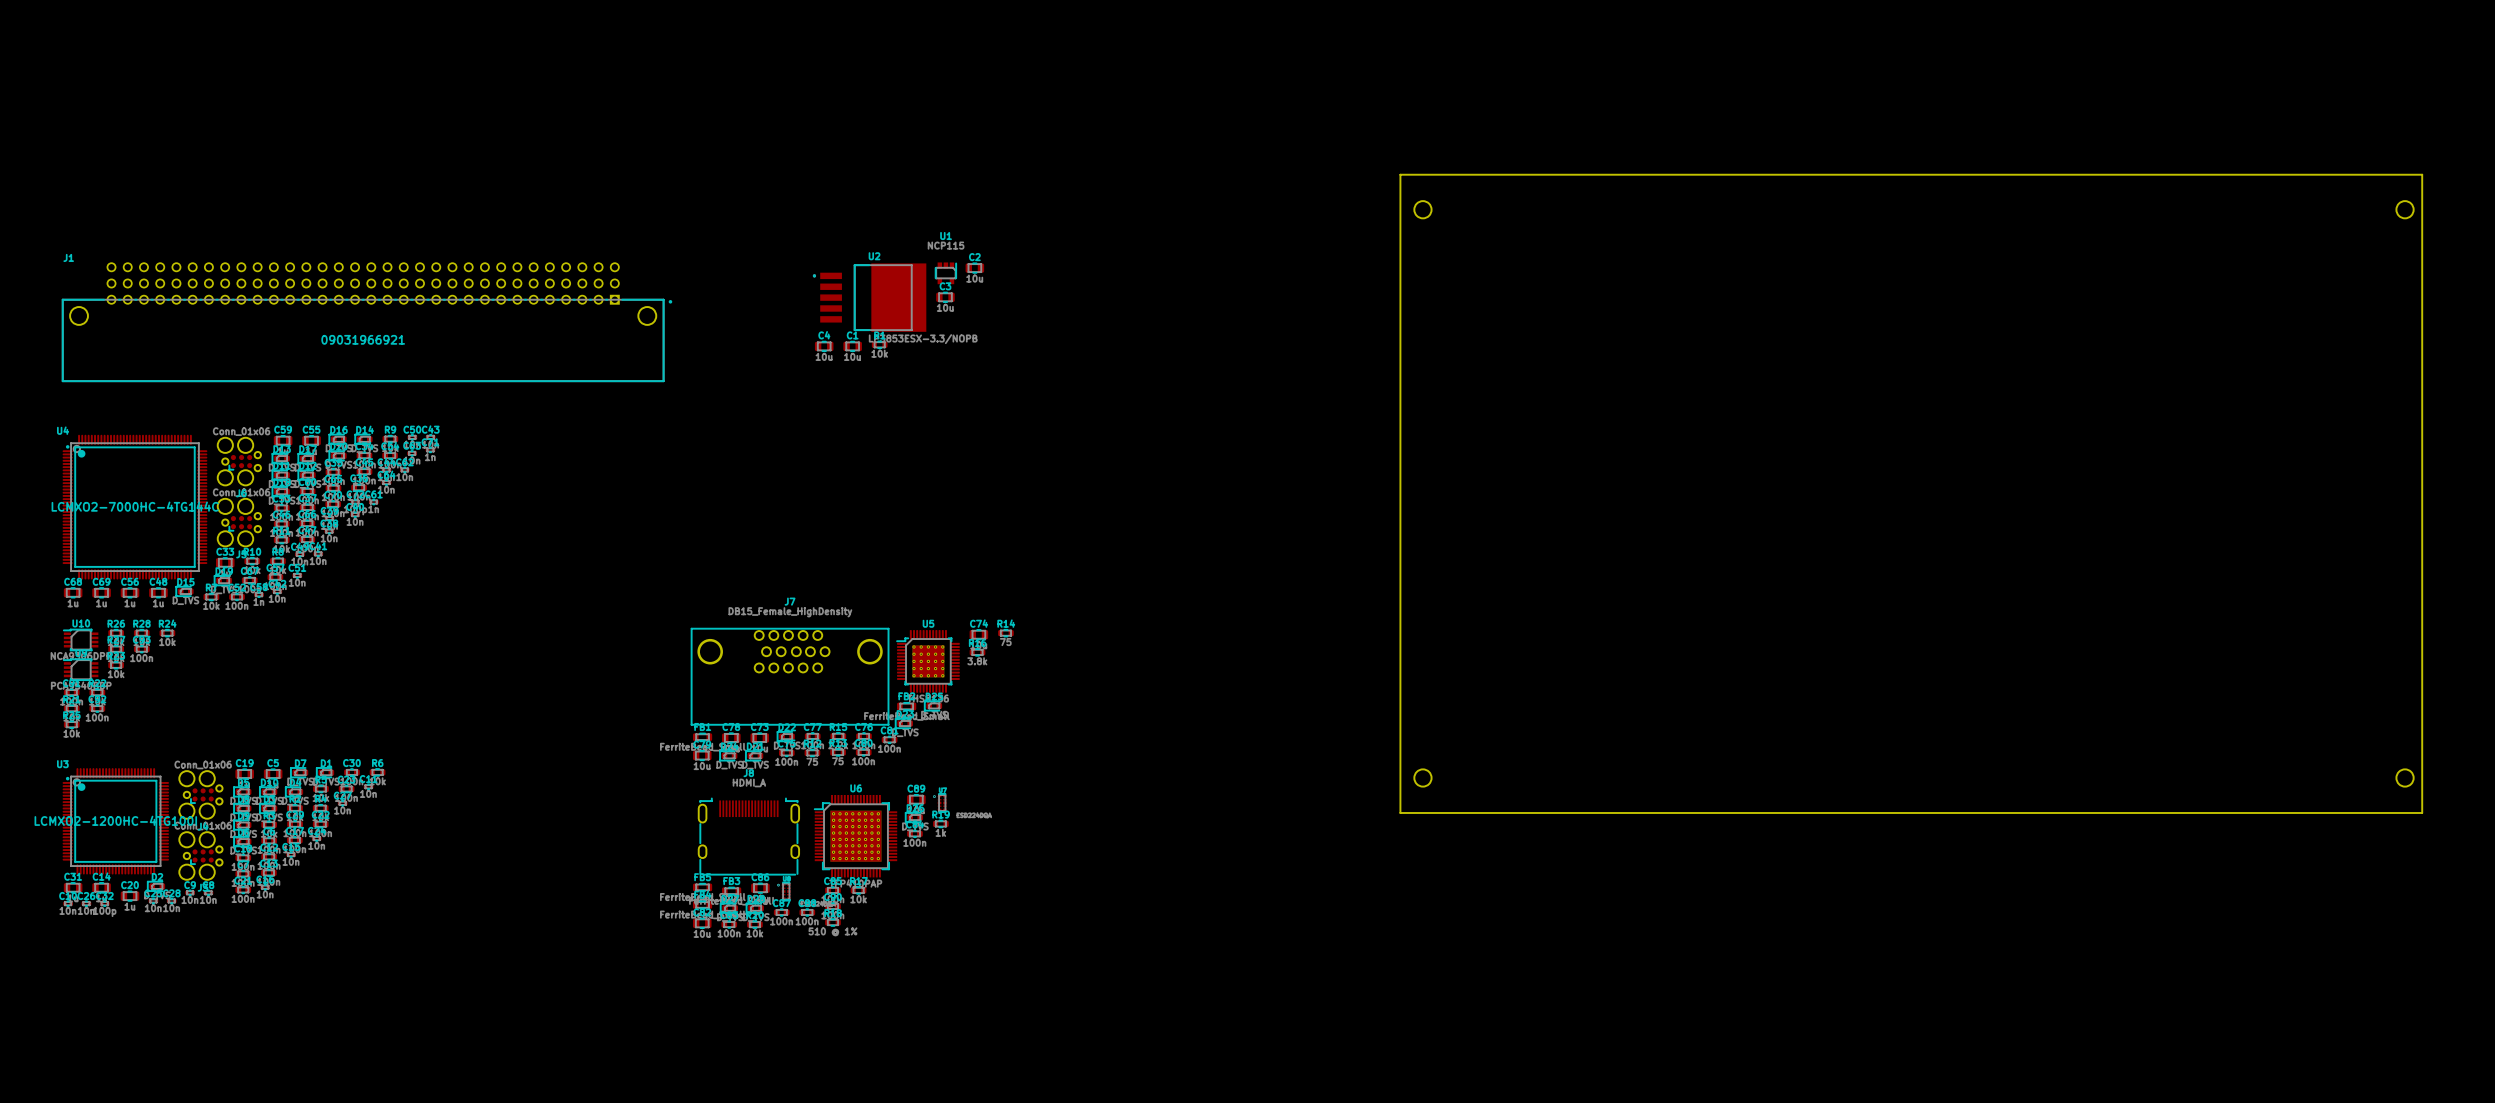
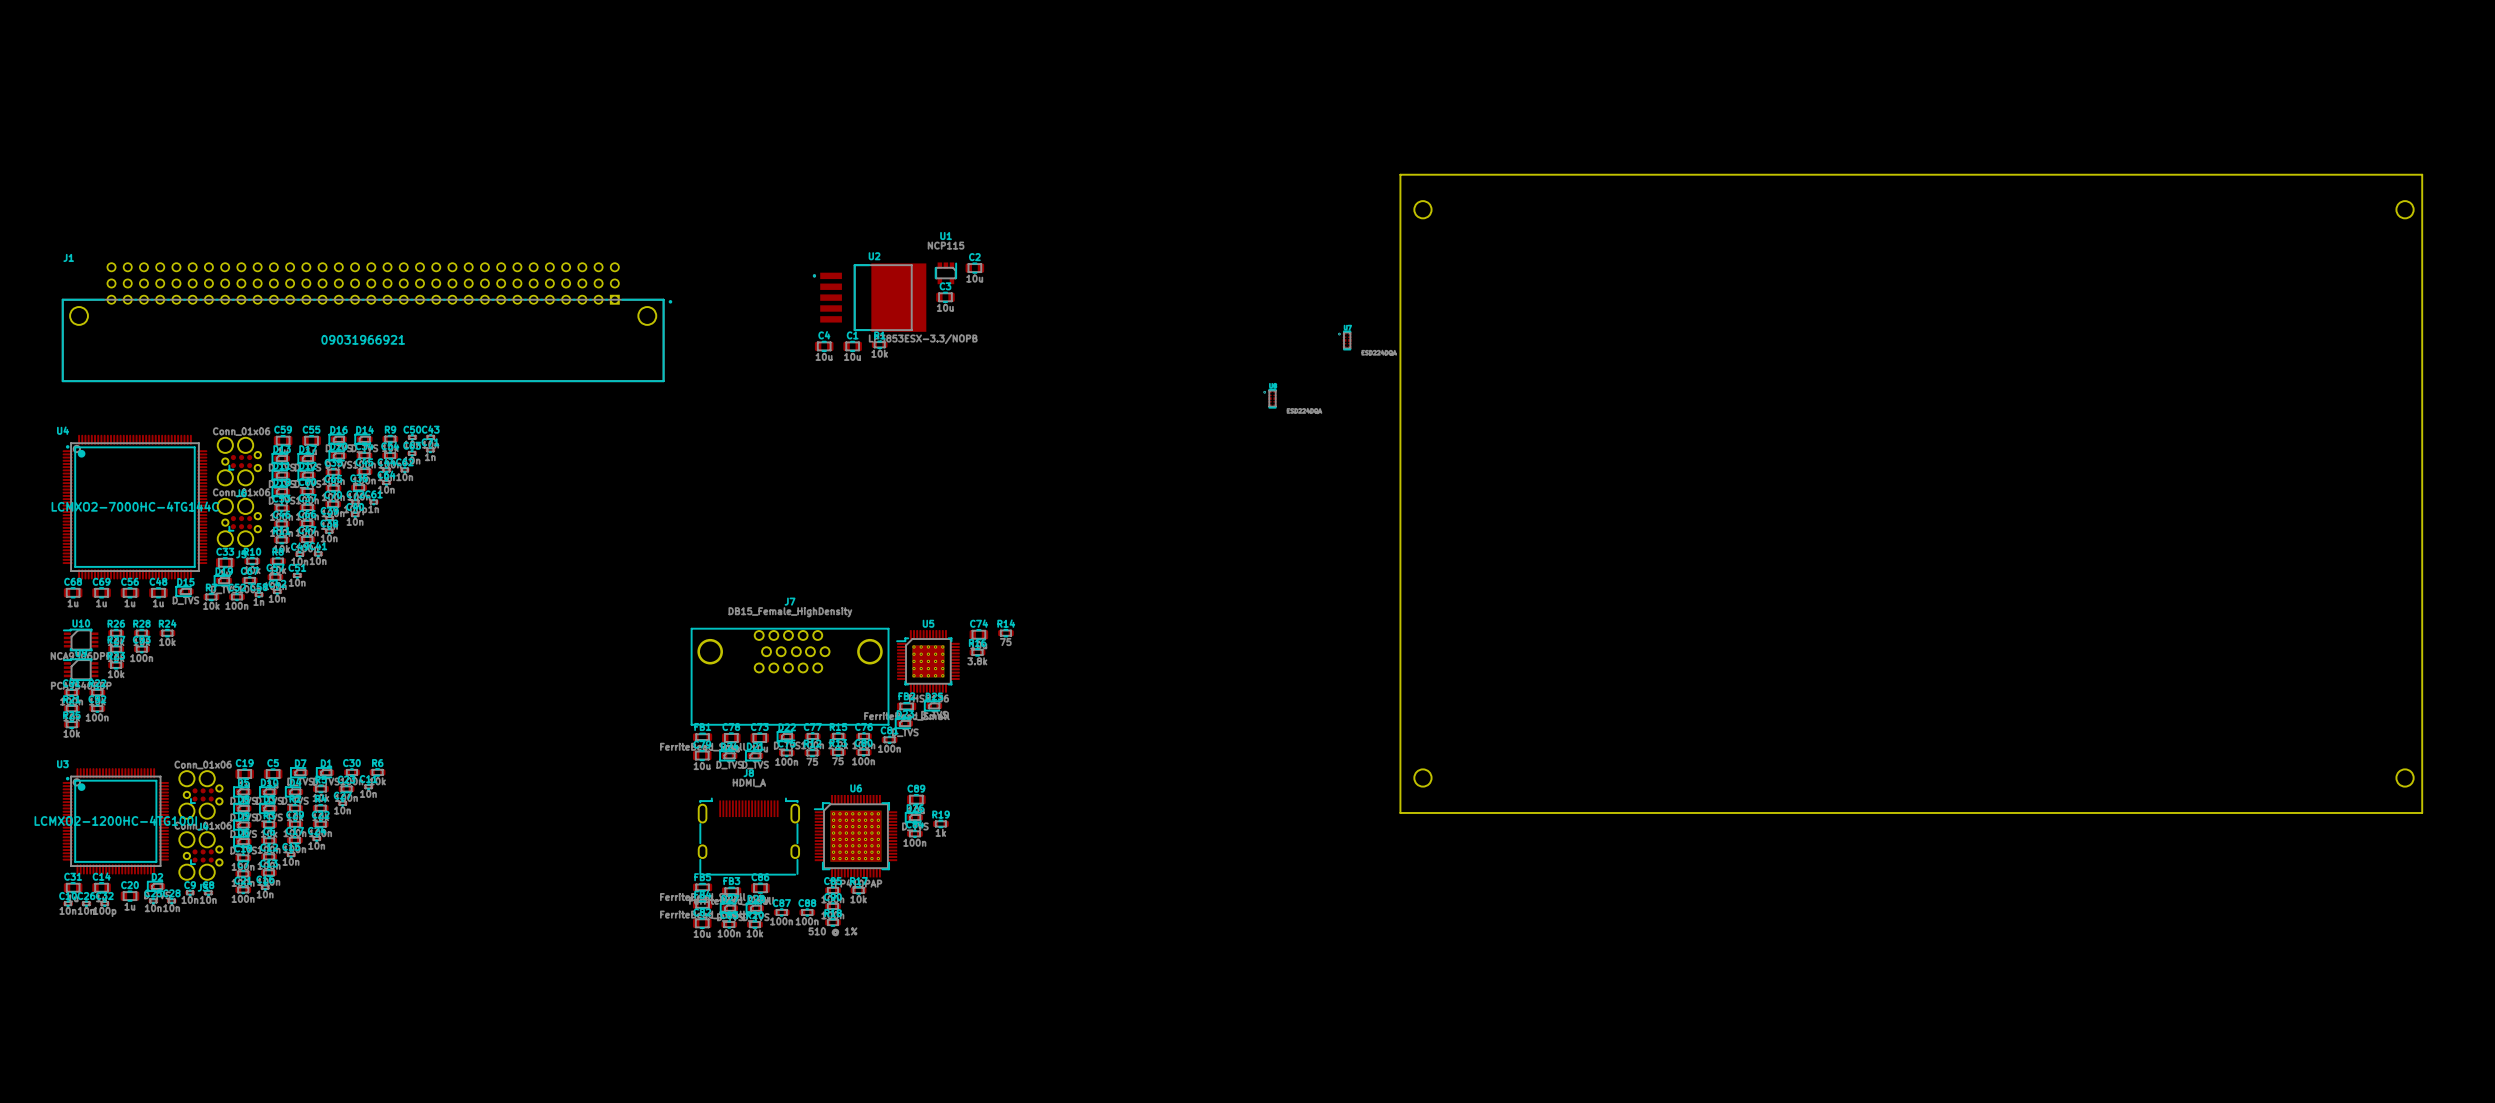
part position: (940, 802) -> (1345, 340)
part position: (784, 891) -> (1270, 398)

